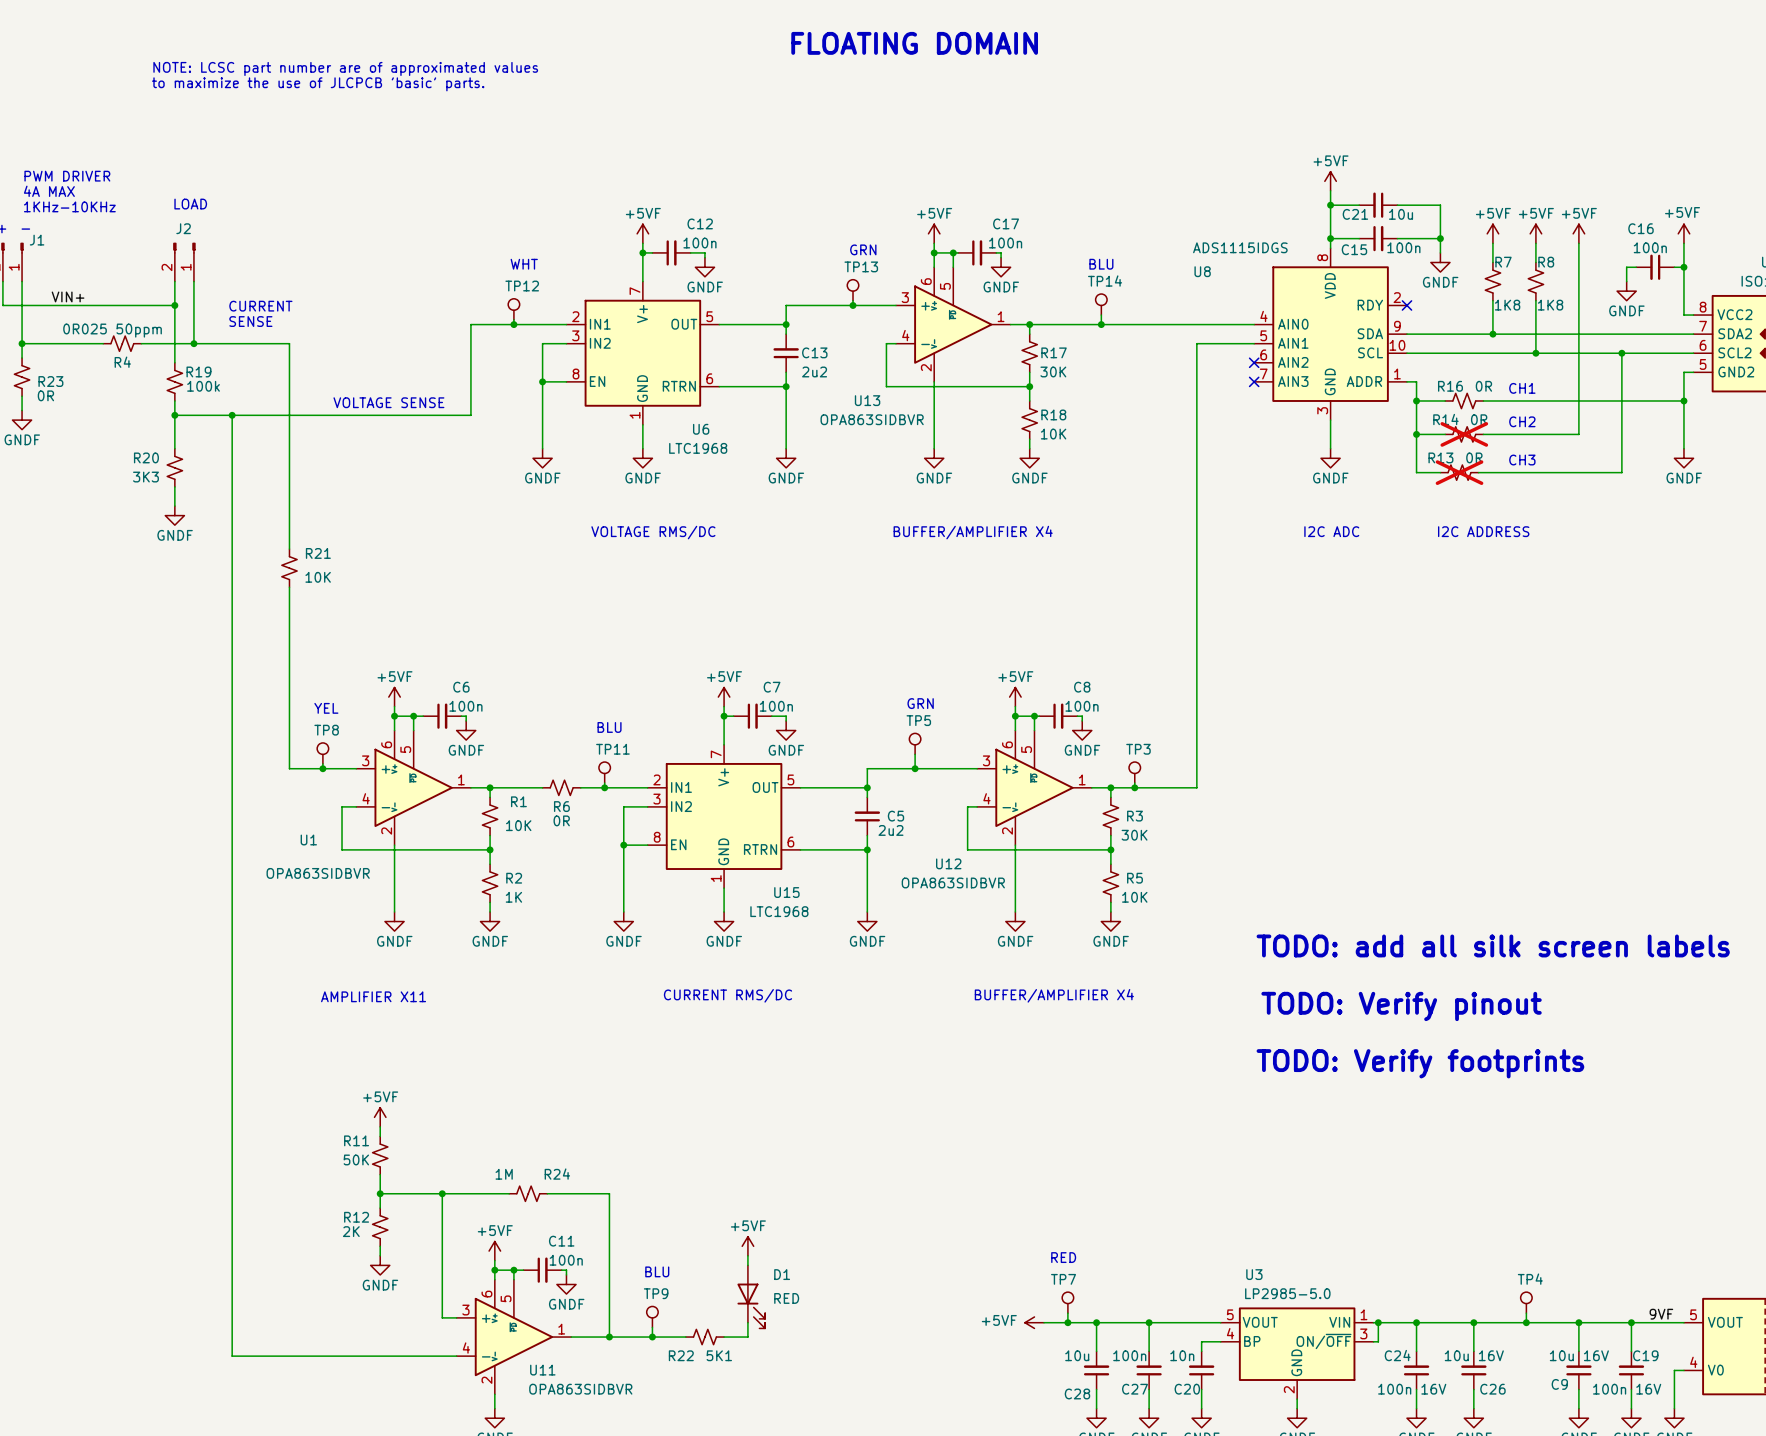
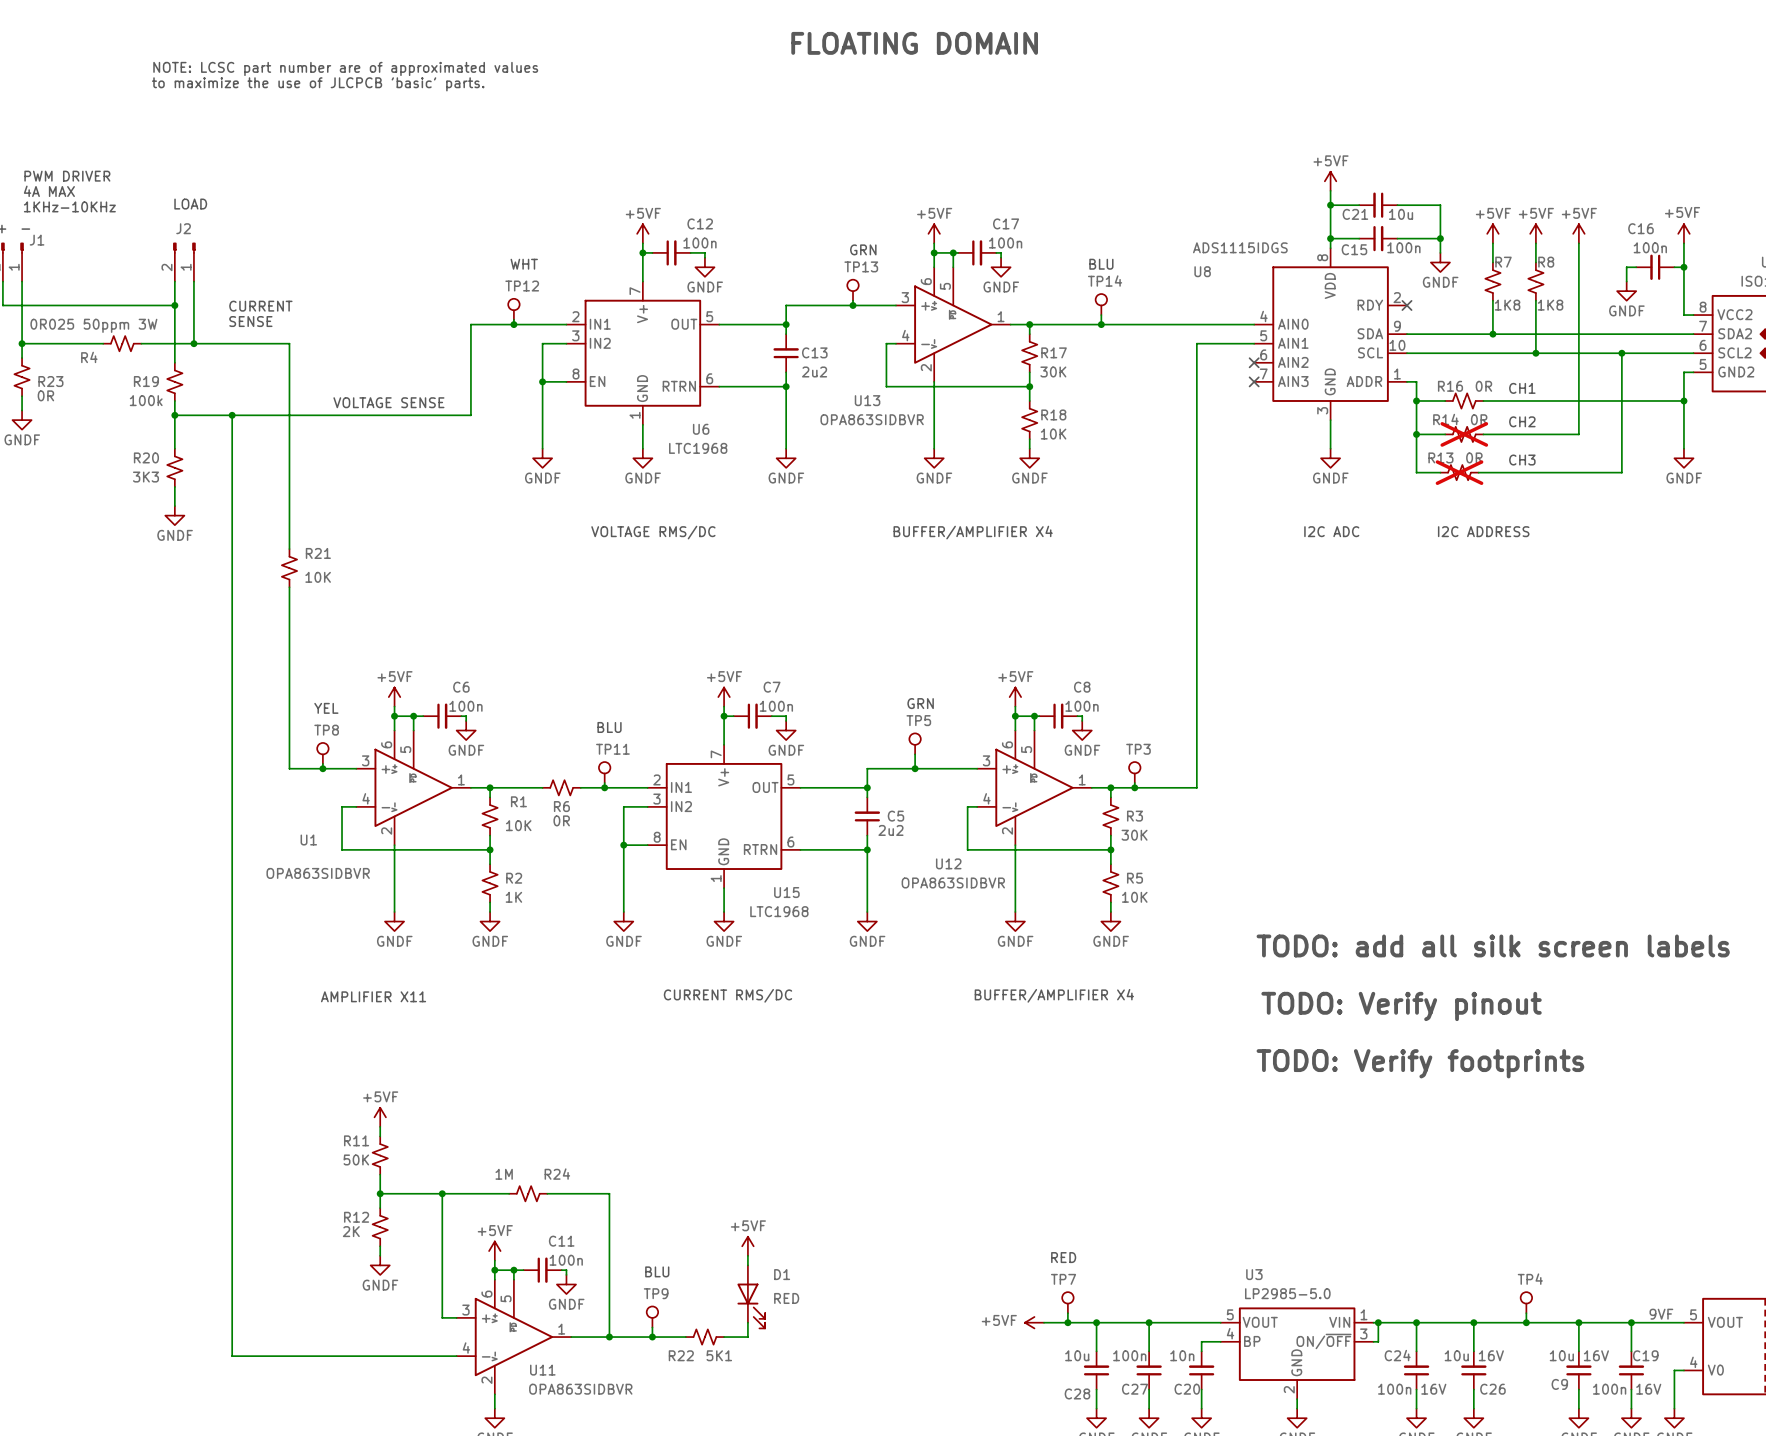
label: VIN+ (68, 296) -> none
R4 value: 0R025 50ppm (112, 330) -> 0R025 50ppm 3W (93, 325)
R4 name position: R4 (122, 362) -> R4 (89, 357)
R19 name position: R19 (198, 371) -> R19 (146, 381)
R19 value position: 100k (203, 386) -> 100k (146, 400)

